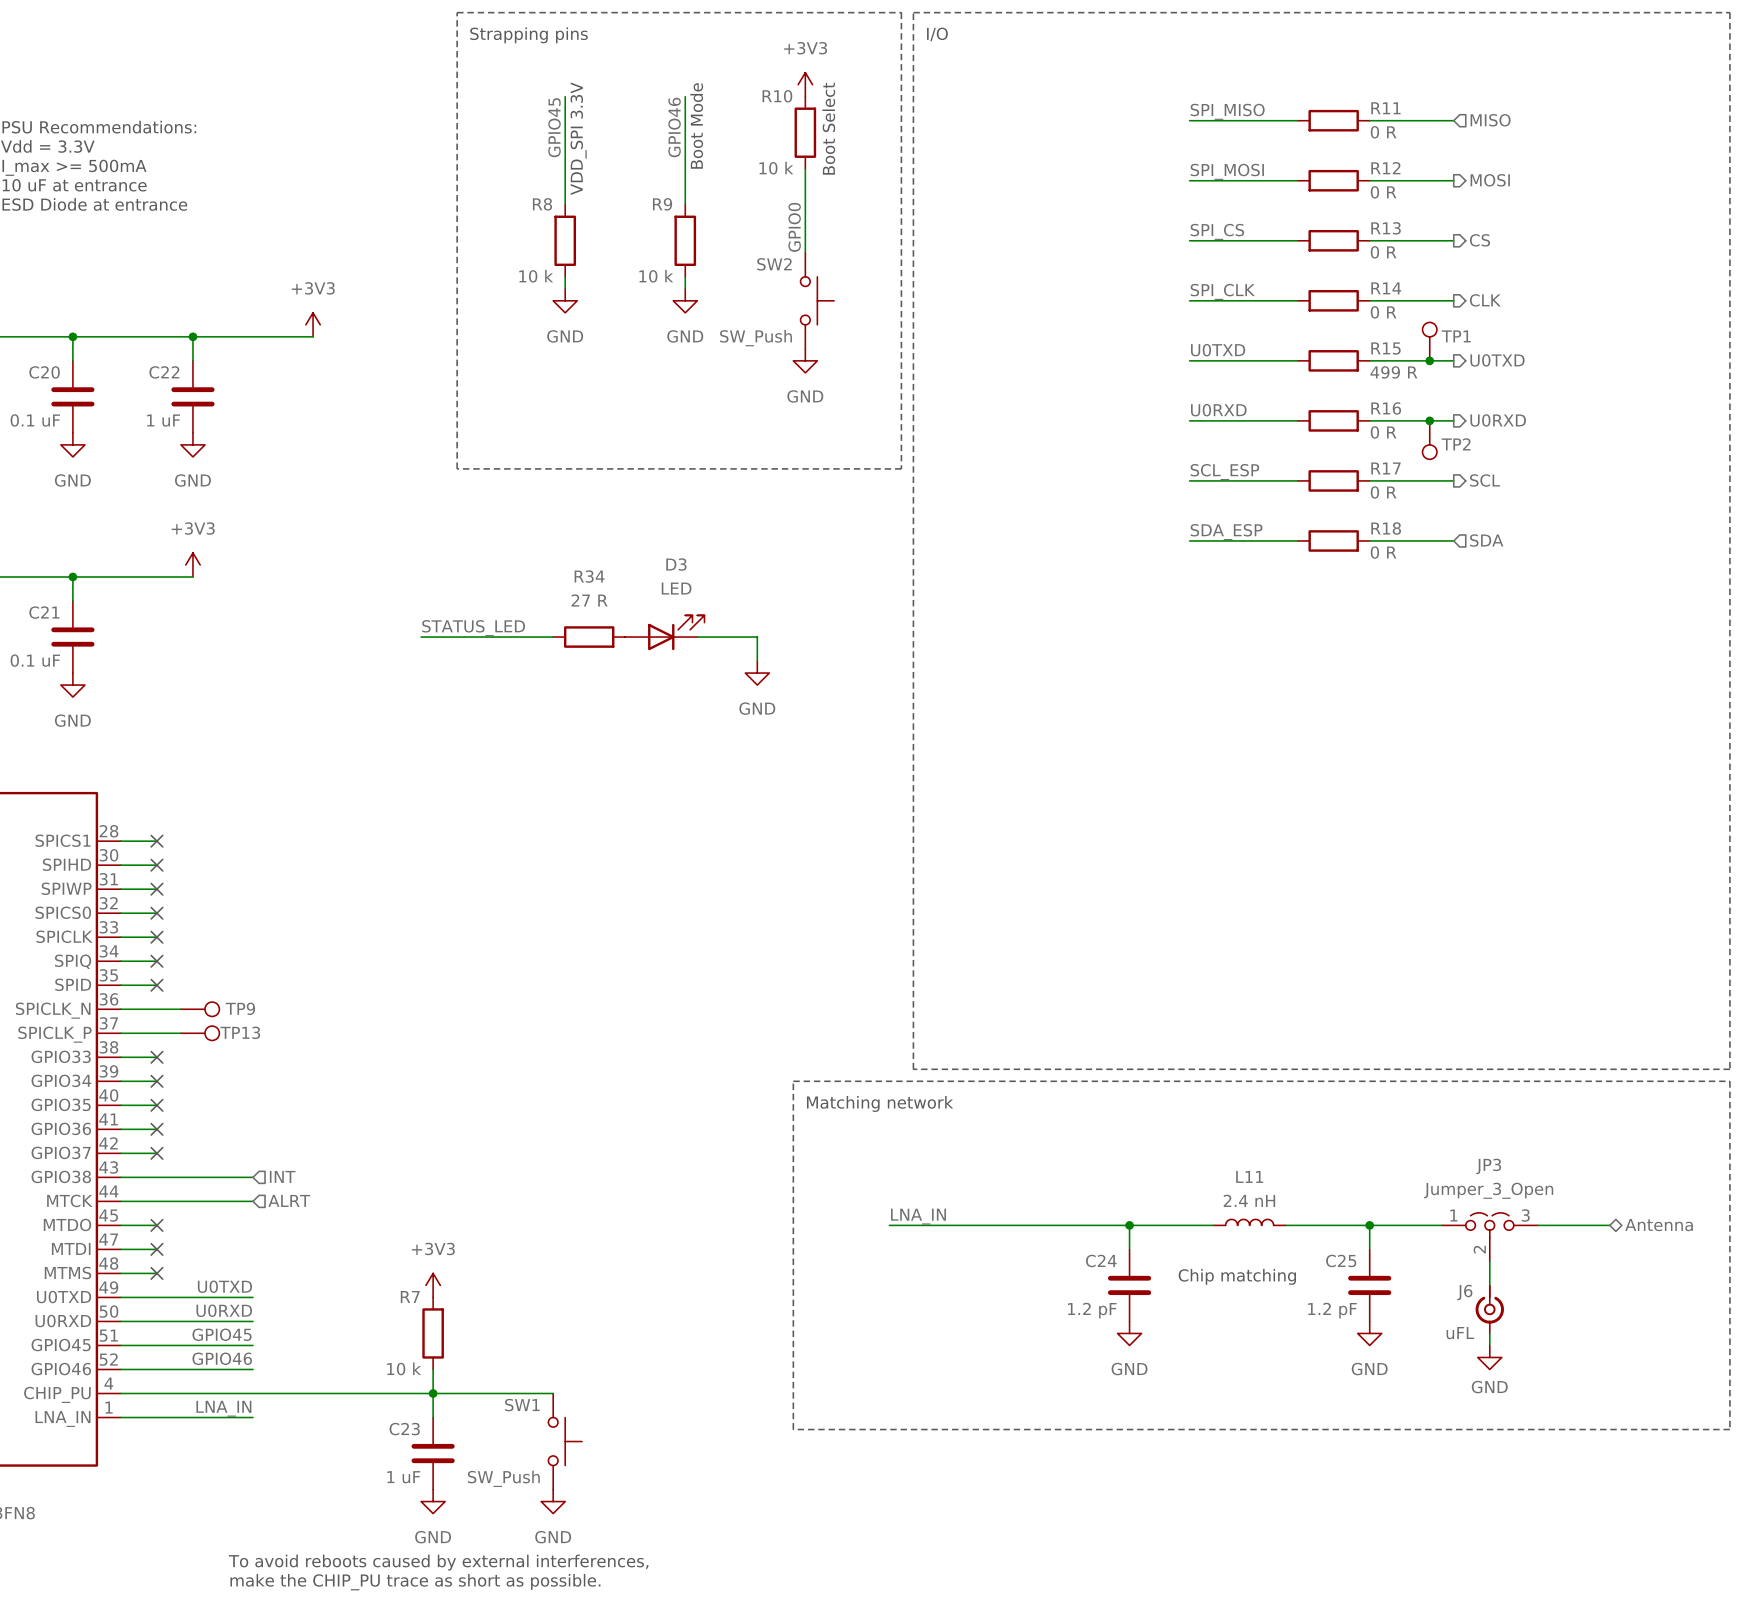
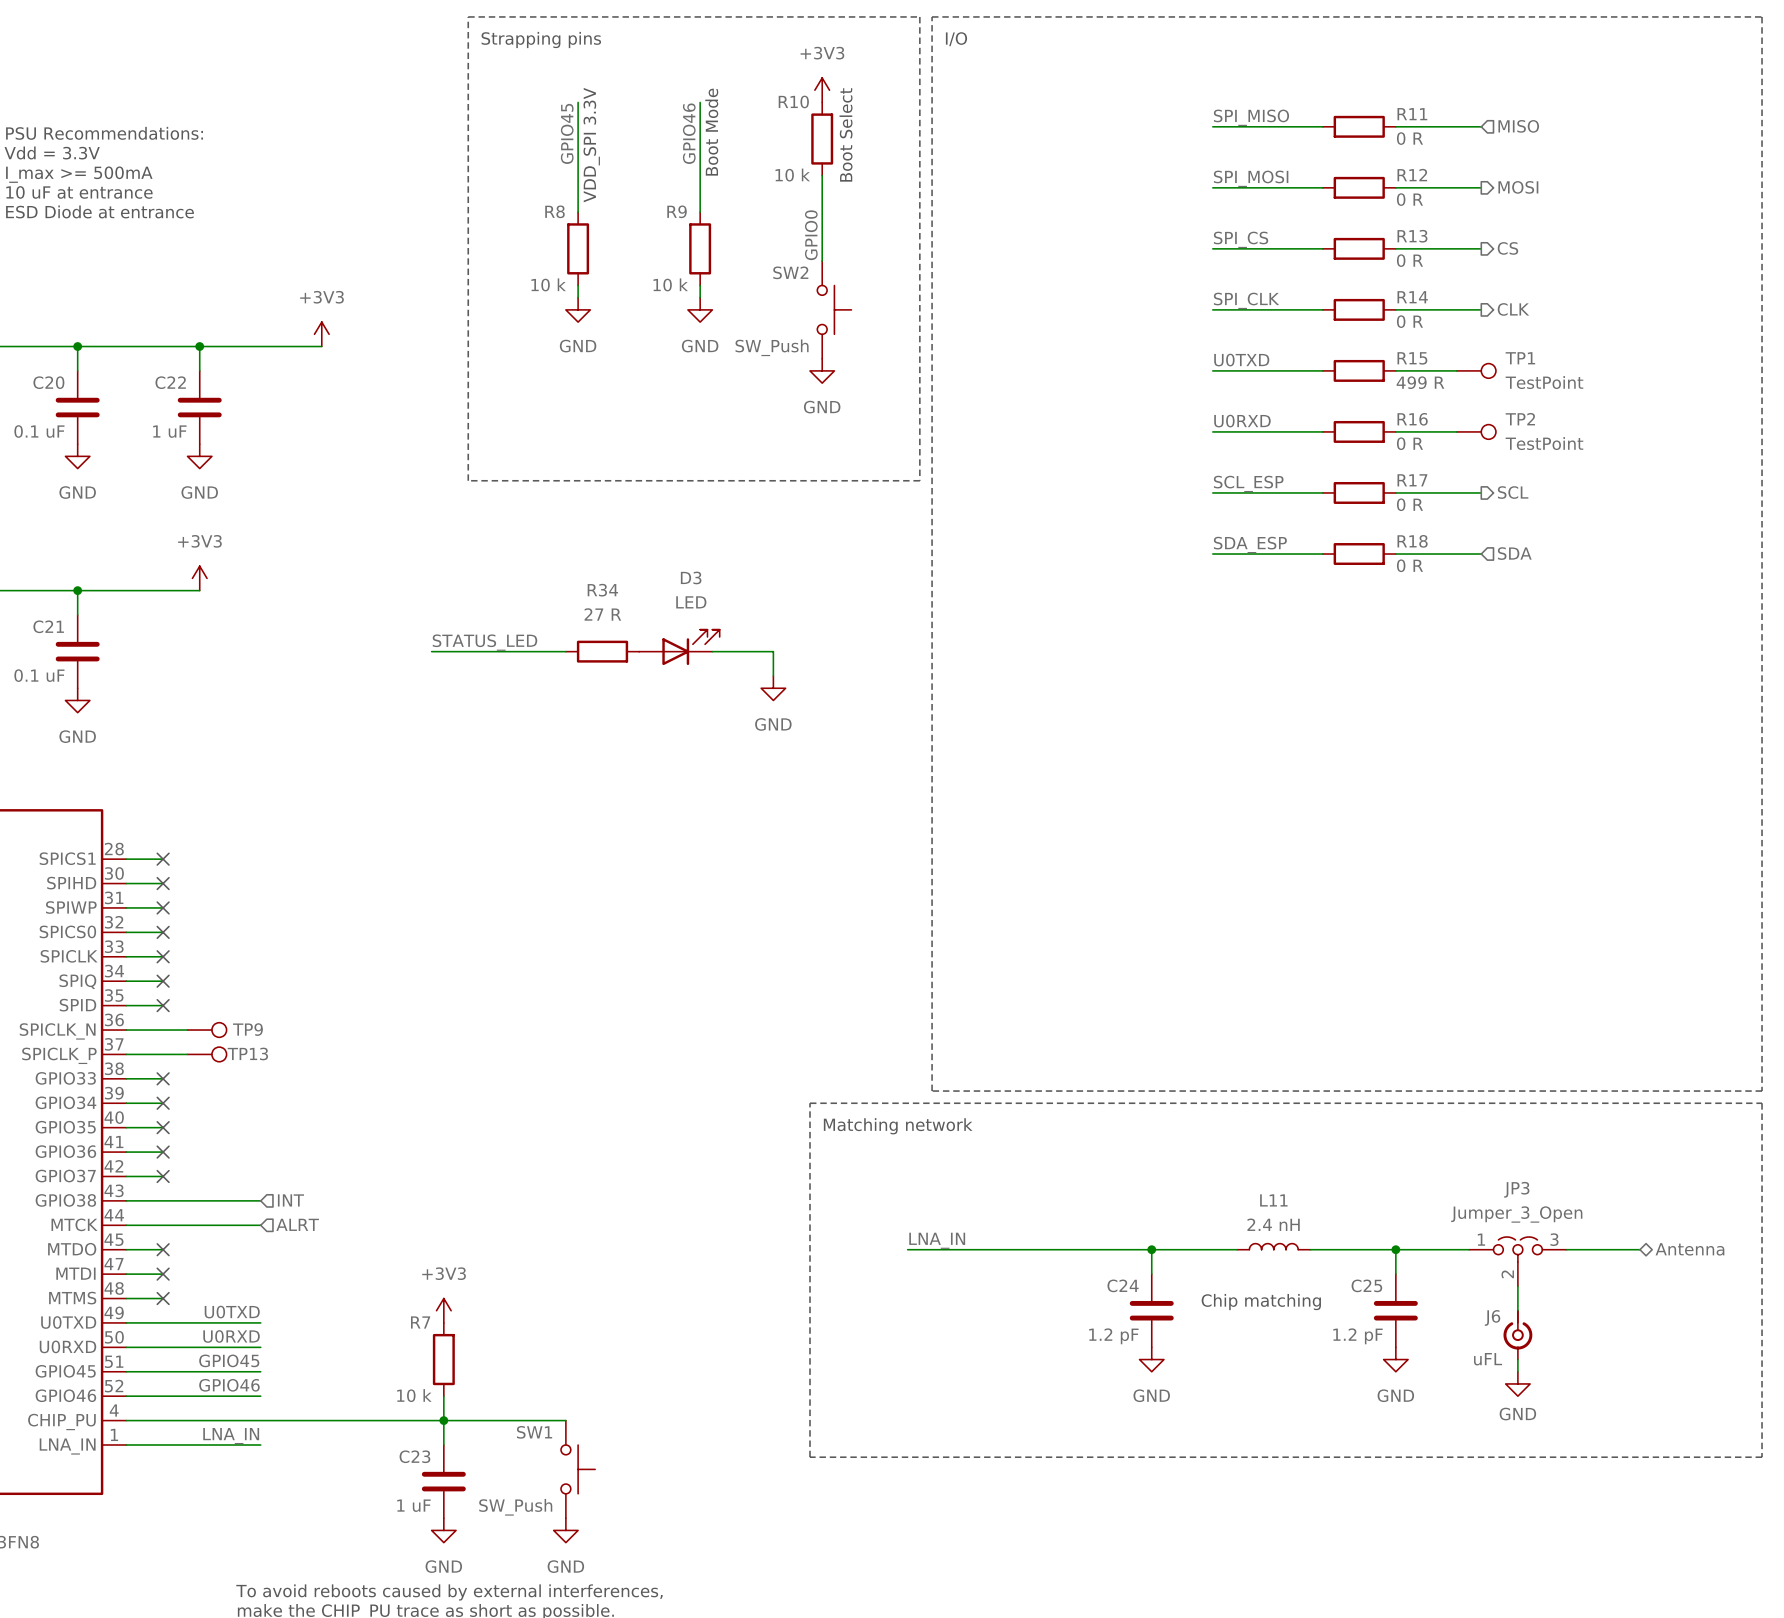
TP1 rotation: 0° (1429, 329) -> 90° clockwise (1488, 370)
TP1 position: (1429, 341) -> (1476, 370)
junction: (1429, 360) -> none
hierarchical label: U0TXD (1497, 360) -> none
TP1 value: none -> TestPoint (1544, 382)
junction: (1429, 420) -> none
hierarchical label: U0RXD (1498, 420) -> none
TP2 value: none -> TestPoint (1544, 443)
TP2 position: (1429, 440) -> (1476, 431)
TP2 name position: TP2 (1456, 444) -> TP2 (1520, 419)
TP2 rotation: 0° (1429, 452) -> 90° counterclockwise (1488, 431)

